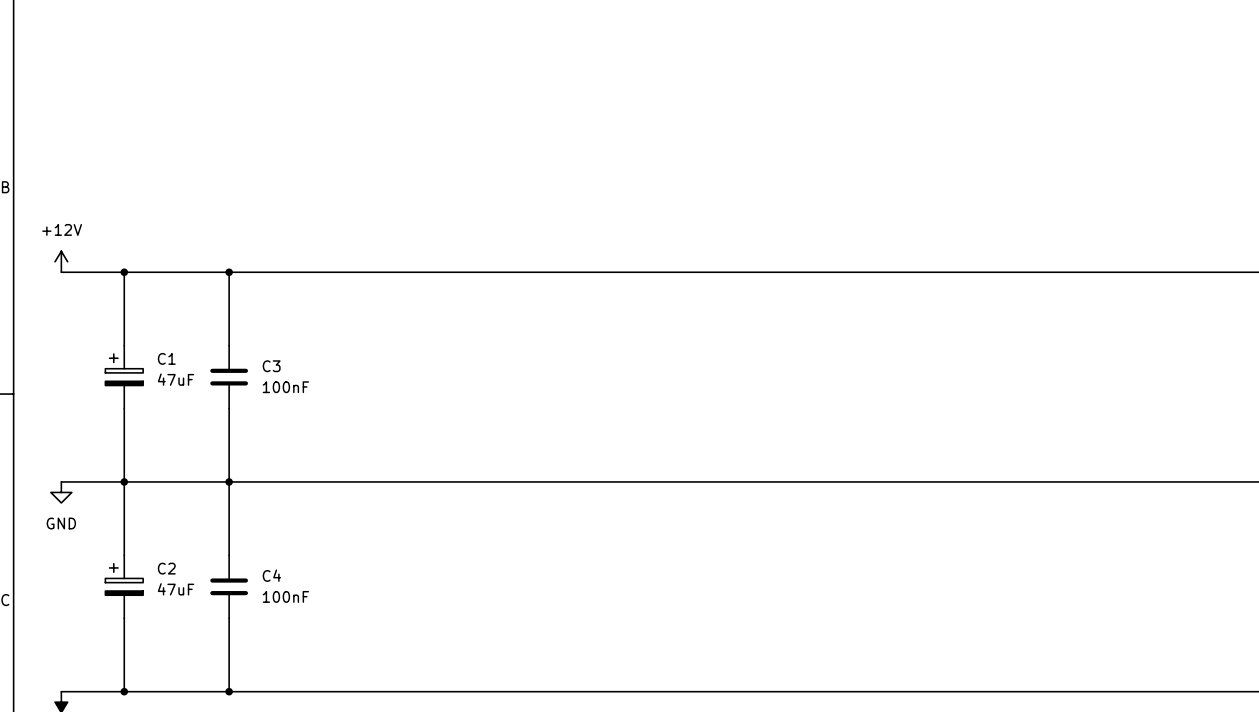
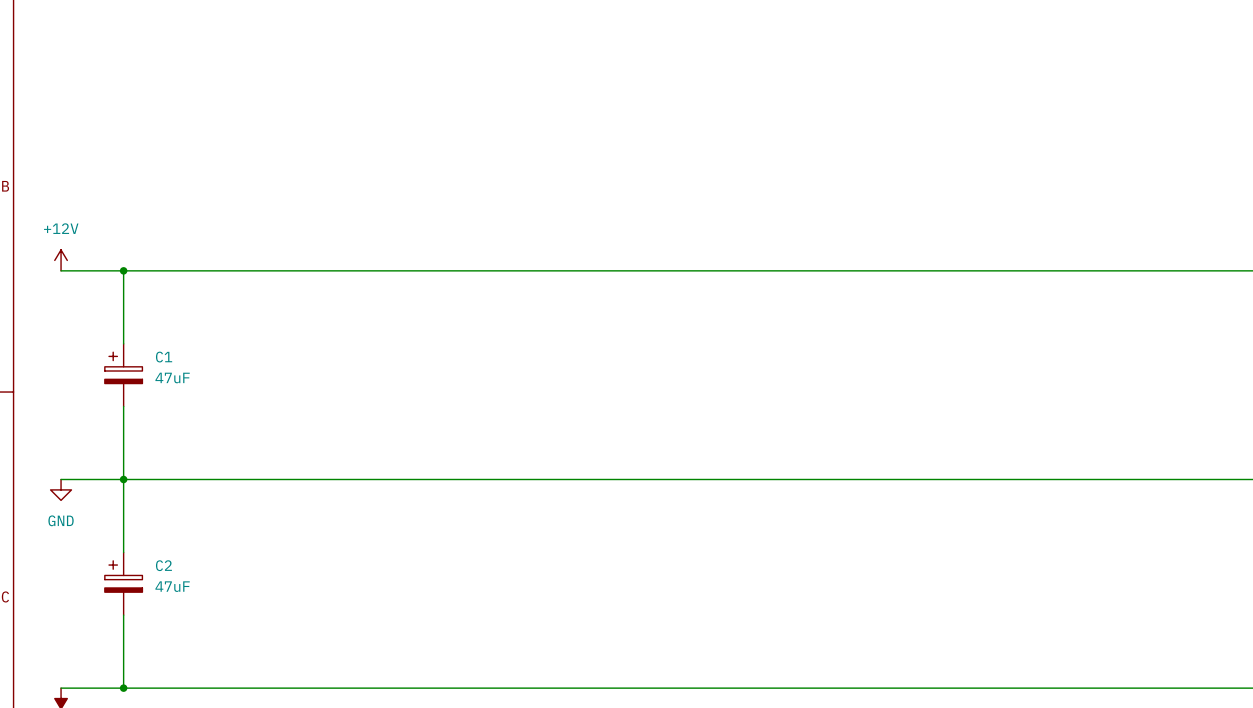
wire: (229, 272) (229, 345) -> none
junction: (229, 272) -> none
C3: 100nF (229, 377) -> none
wire: (229, 408) (229, 555) -> none
junction: (229, 481) -> none
C4: 100nF (229, 586) -> none
wire: (229, 618) (229, 691) -> none
junction: (229, 691) -> none

